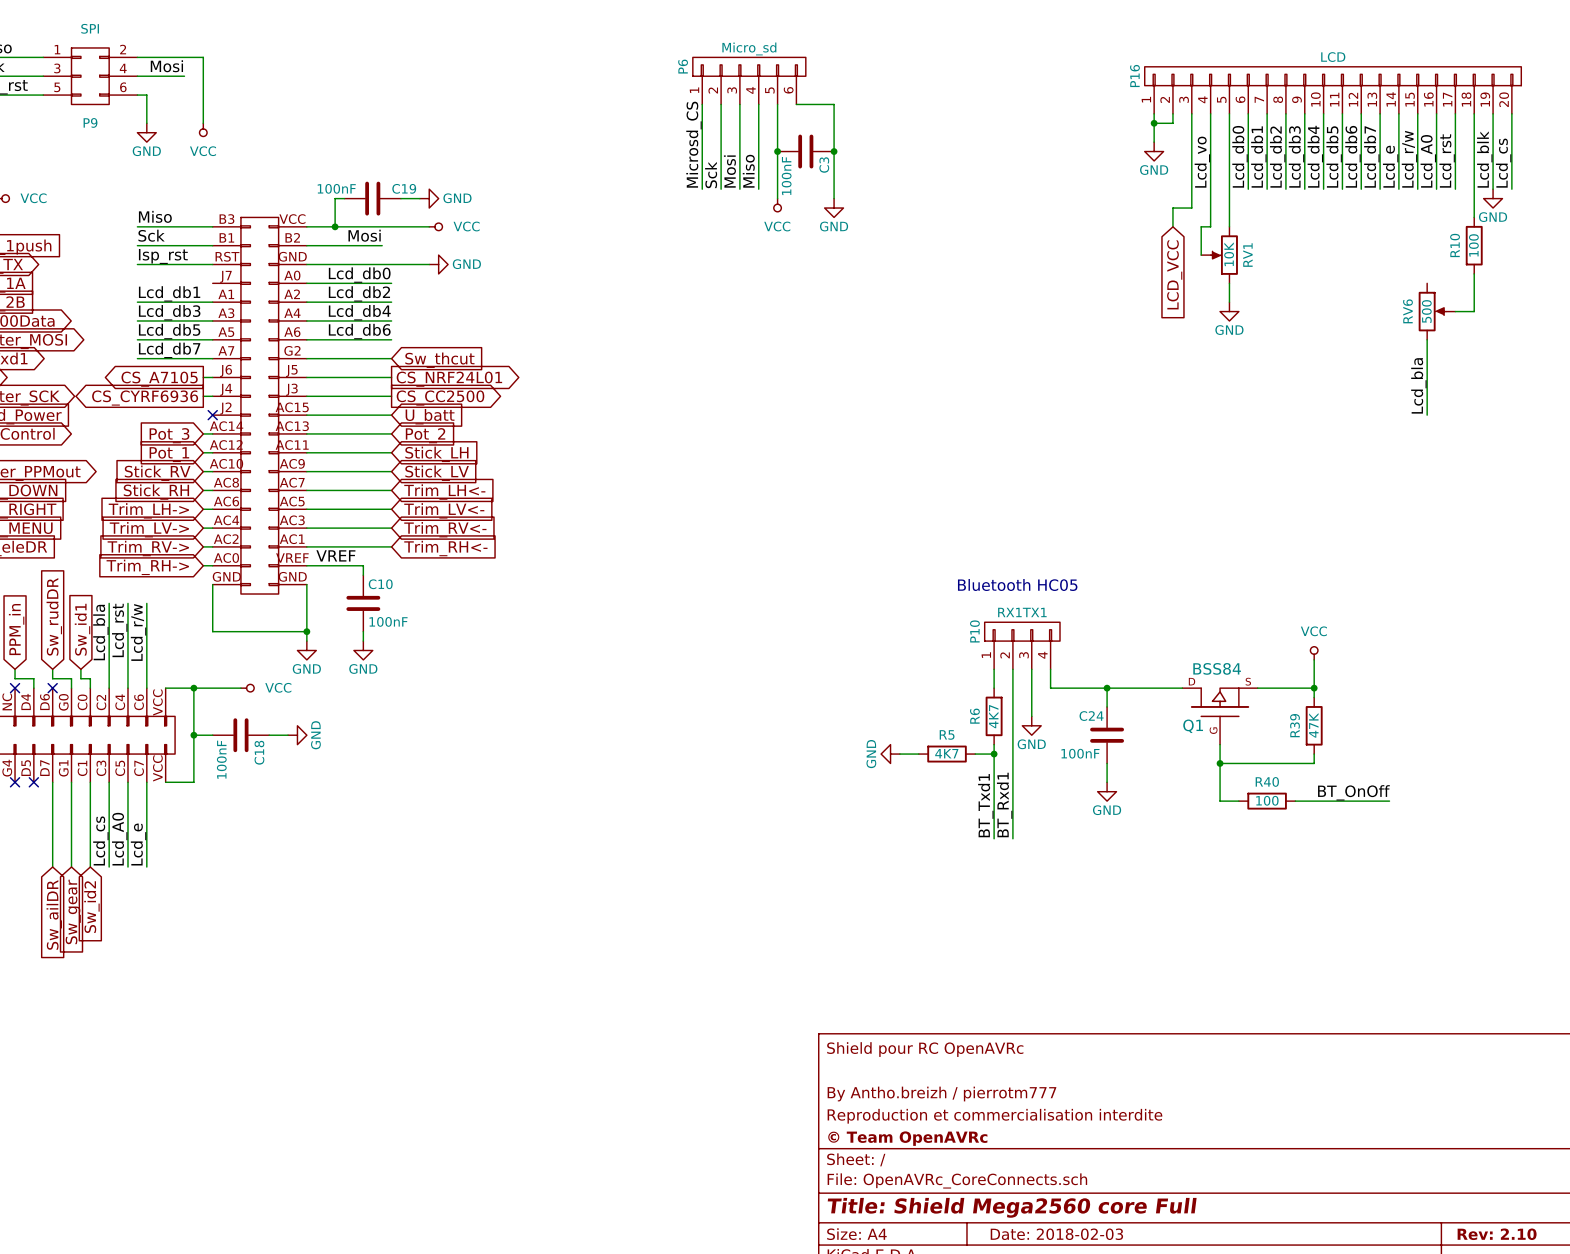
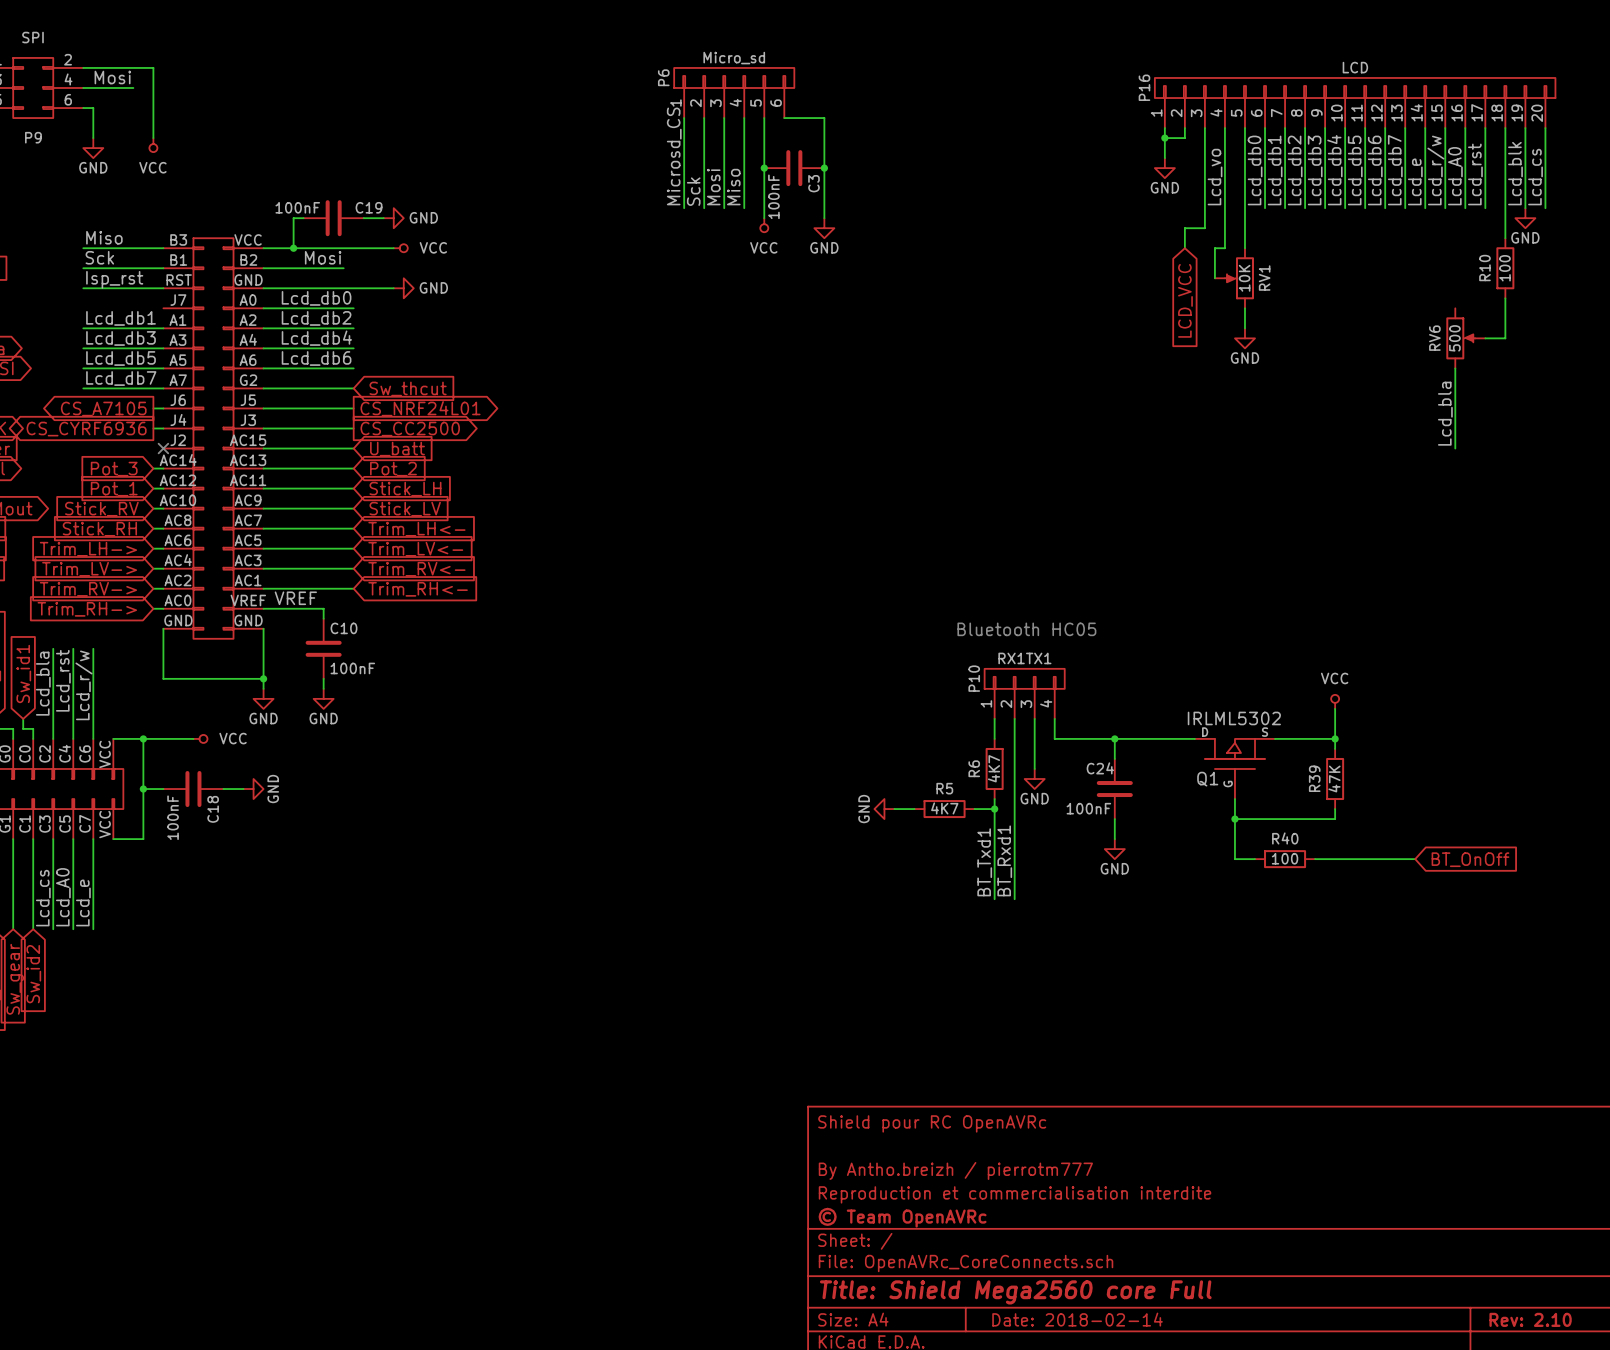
Q1 value: BSS84 (1217, 668) -> IRLML5302 (1234, 718)
label: BT_OnOff (1353, 792) -> none
global label: none -> BT_OnOff (1470, 859)
title block: Date: 2018-02-03 (1056, 1234) -> Date: 2018-02-14 (1077, 1319)

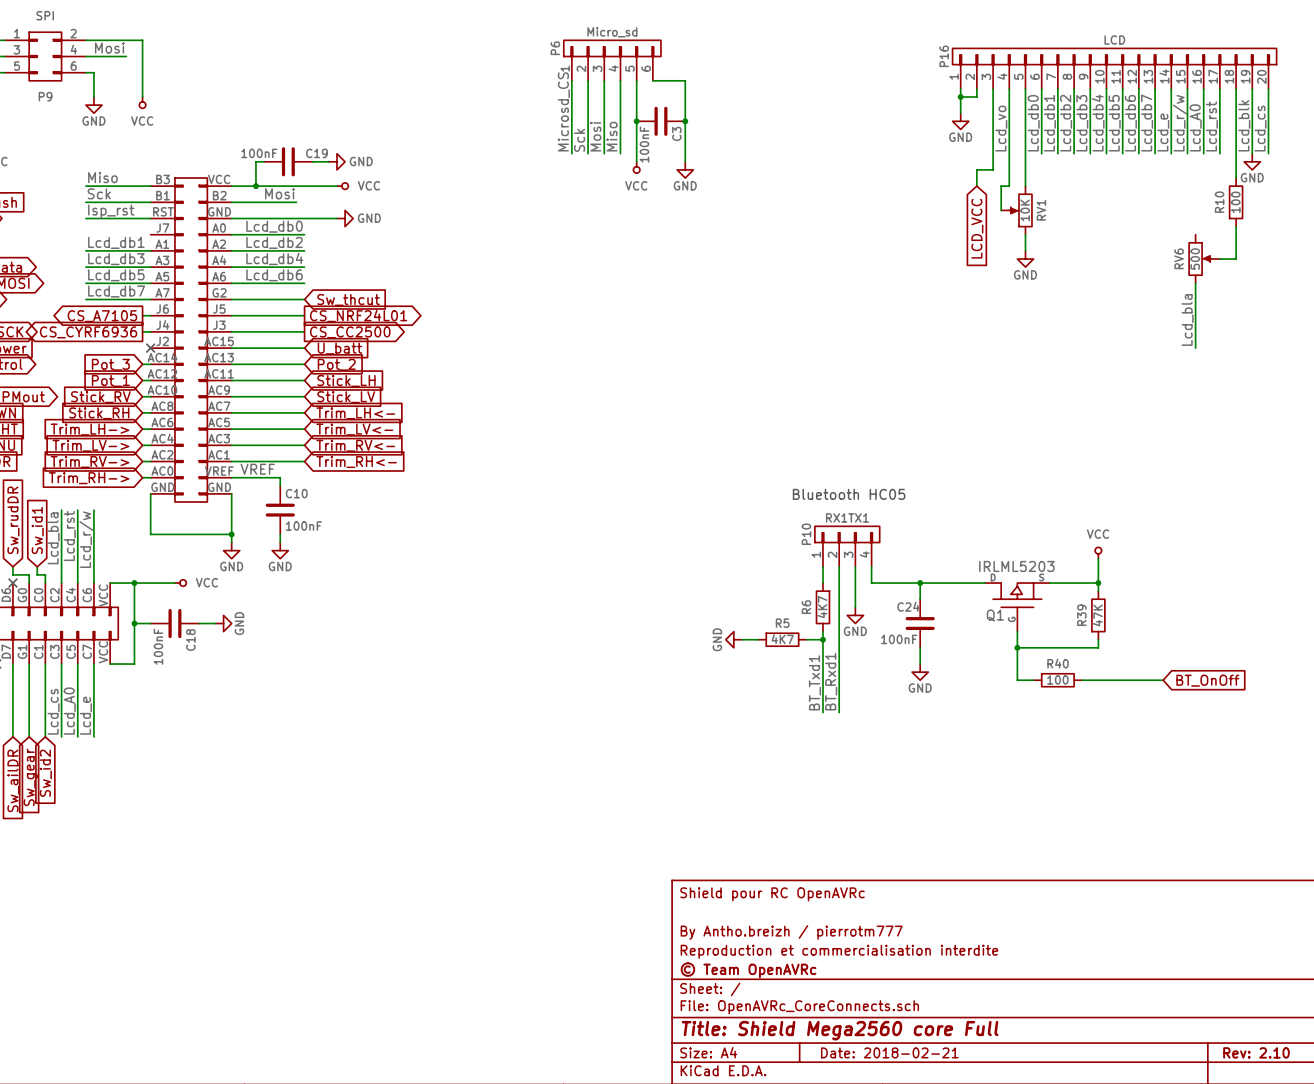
Q1 value: IRLML5302 (1234, 718) -> IRLML5203 (1016, 566)
title block: Date: 2018-02-14 (1077, 1319) -> Date: 2018-02-21 (889, 1052)

